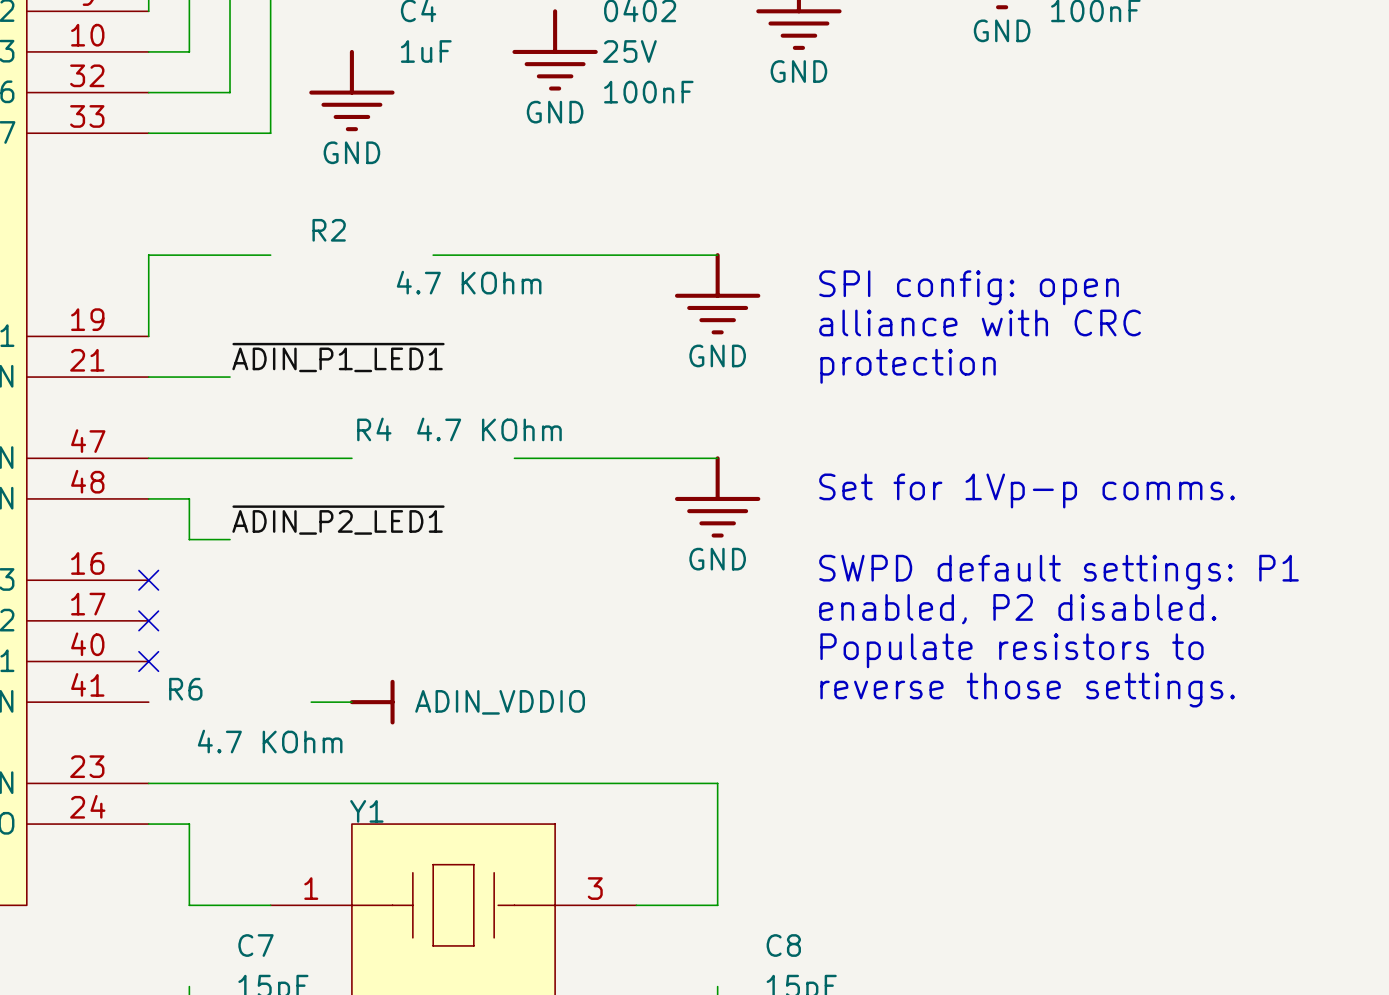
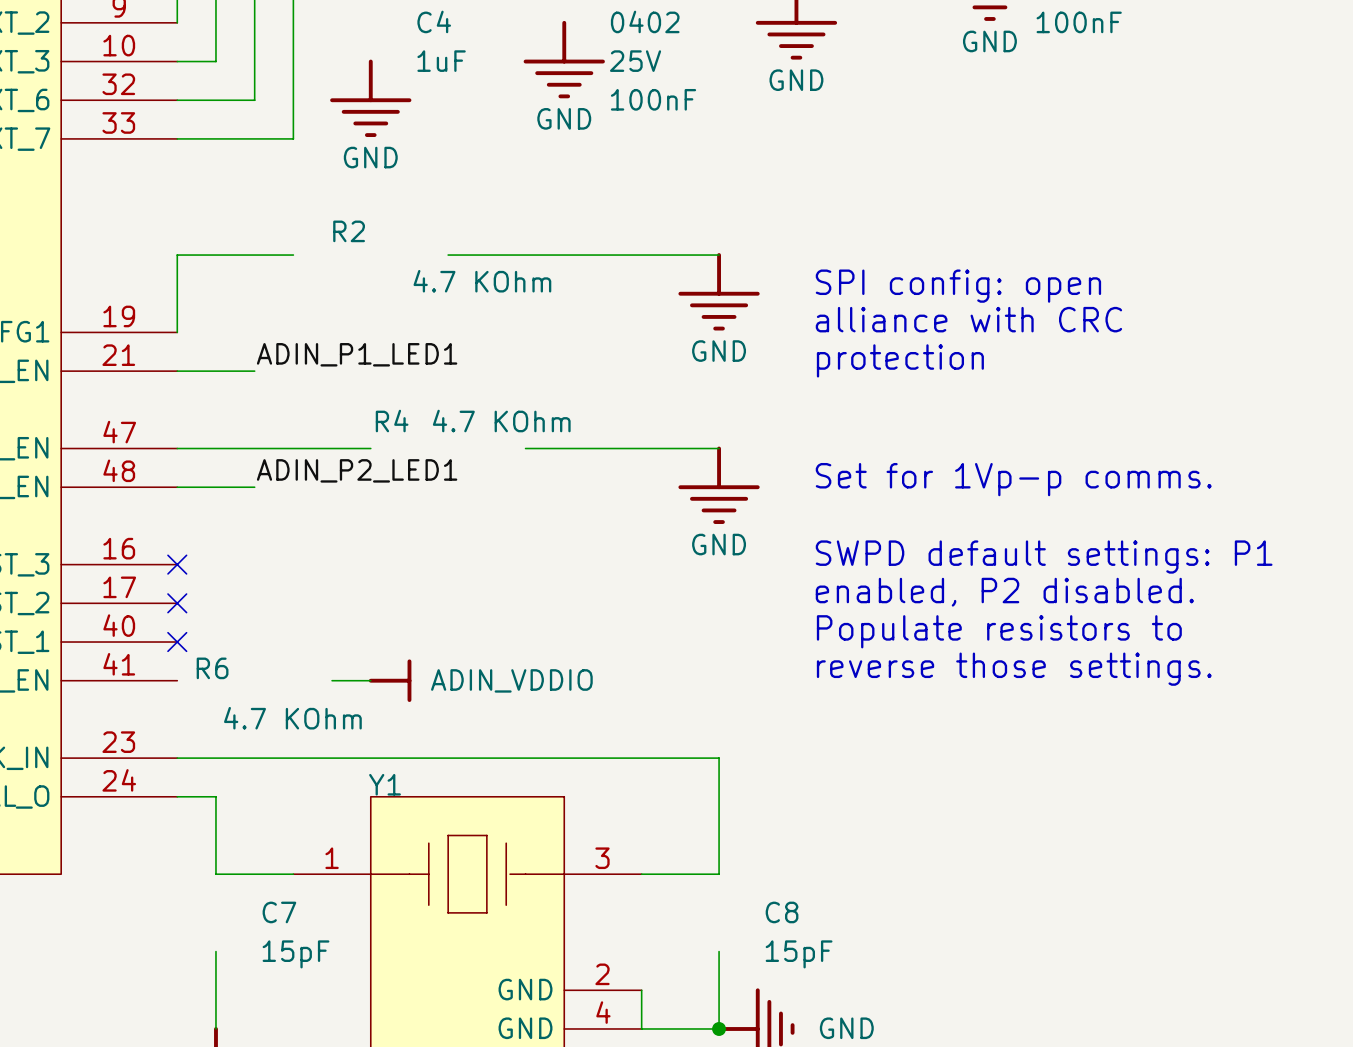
label: ~{ADIN_P1_LED1} (338, 357) -> ADIN_P1_LED1 (357, 354)
wire: (189, 498) (189, 539) (230, 539) -> (215, 487) (254, 487)
label: ~{ADIN_P2_LED1} (338, 520) -> ADIN_P2_LED1 (357, 470)

